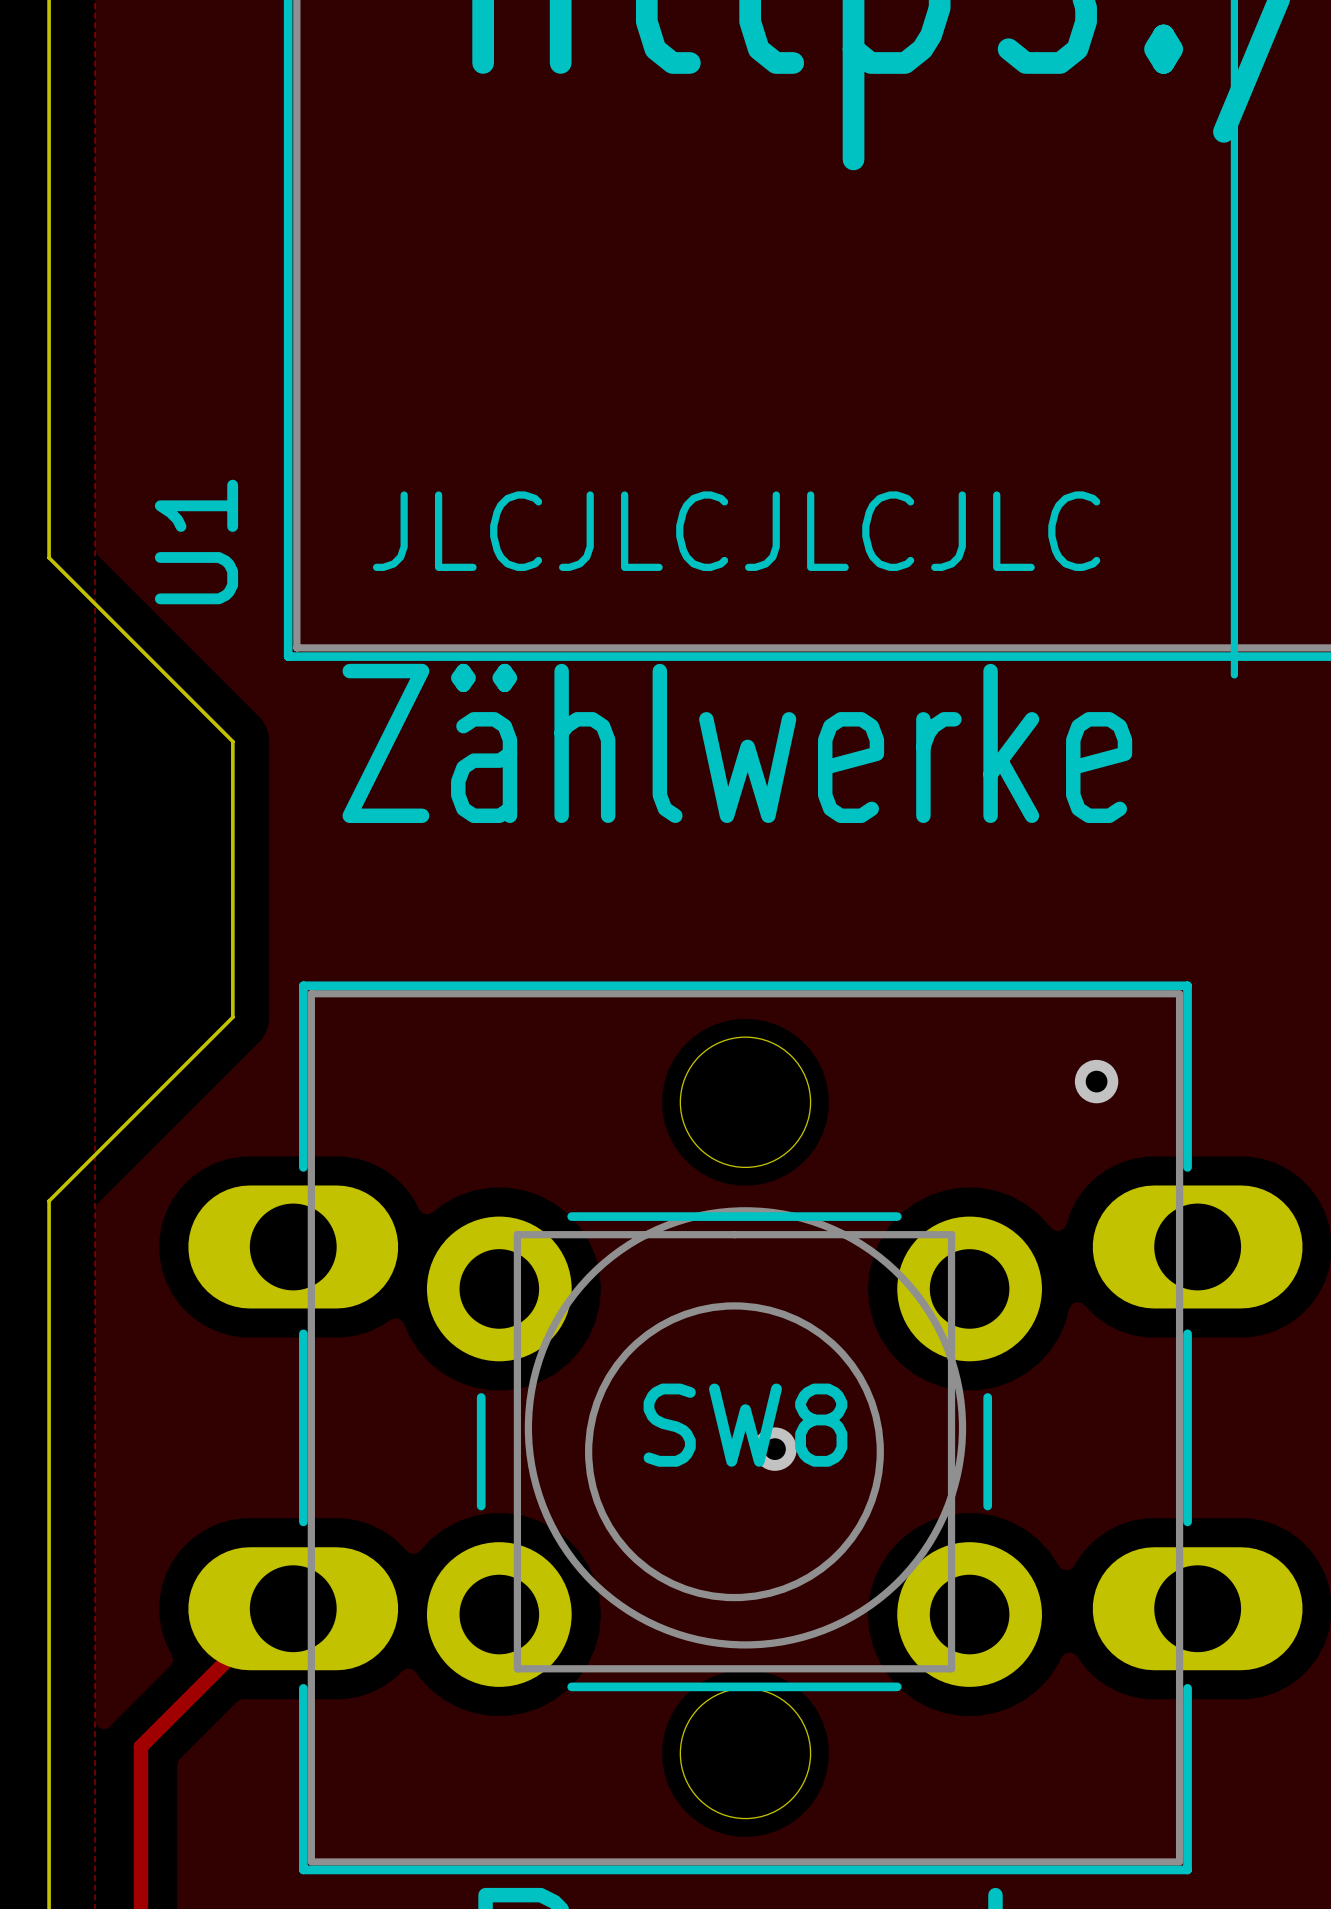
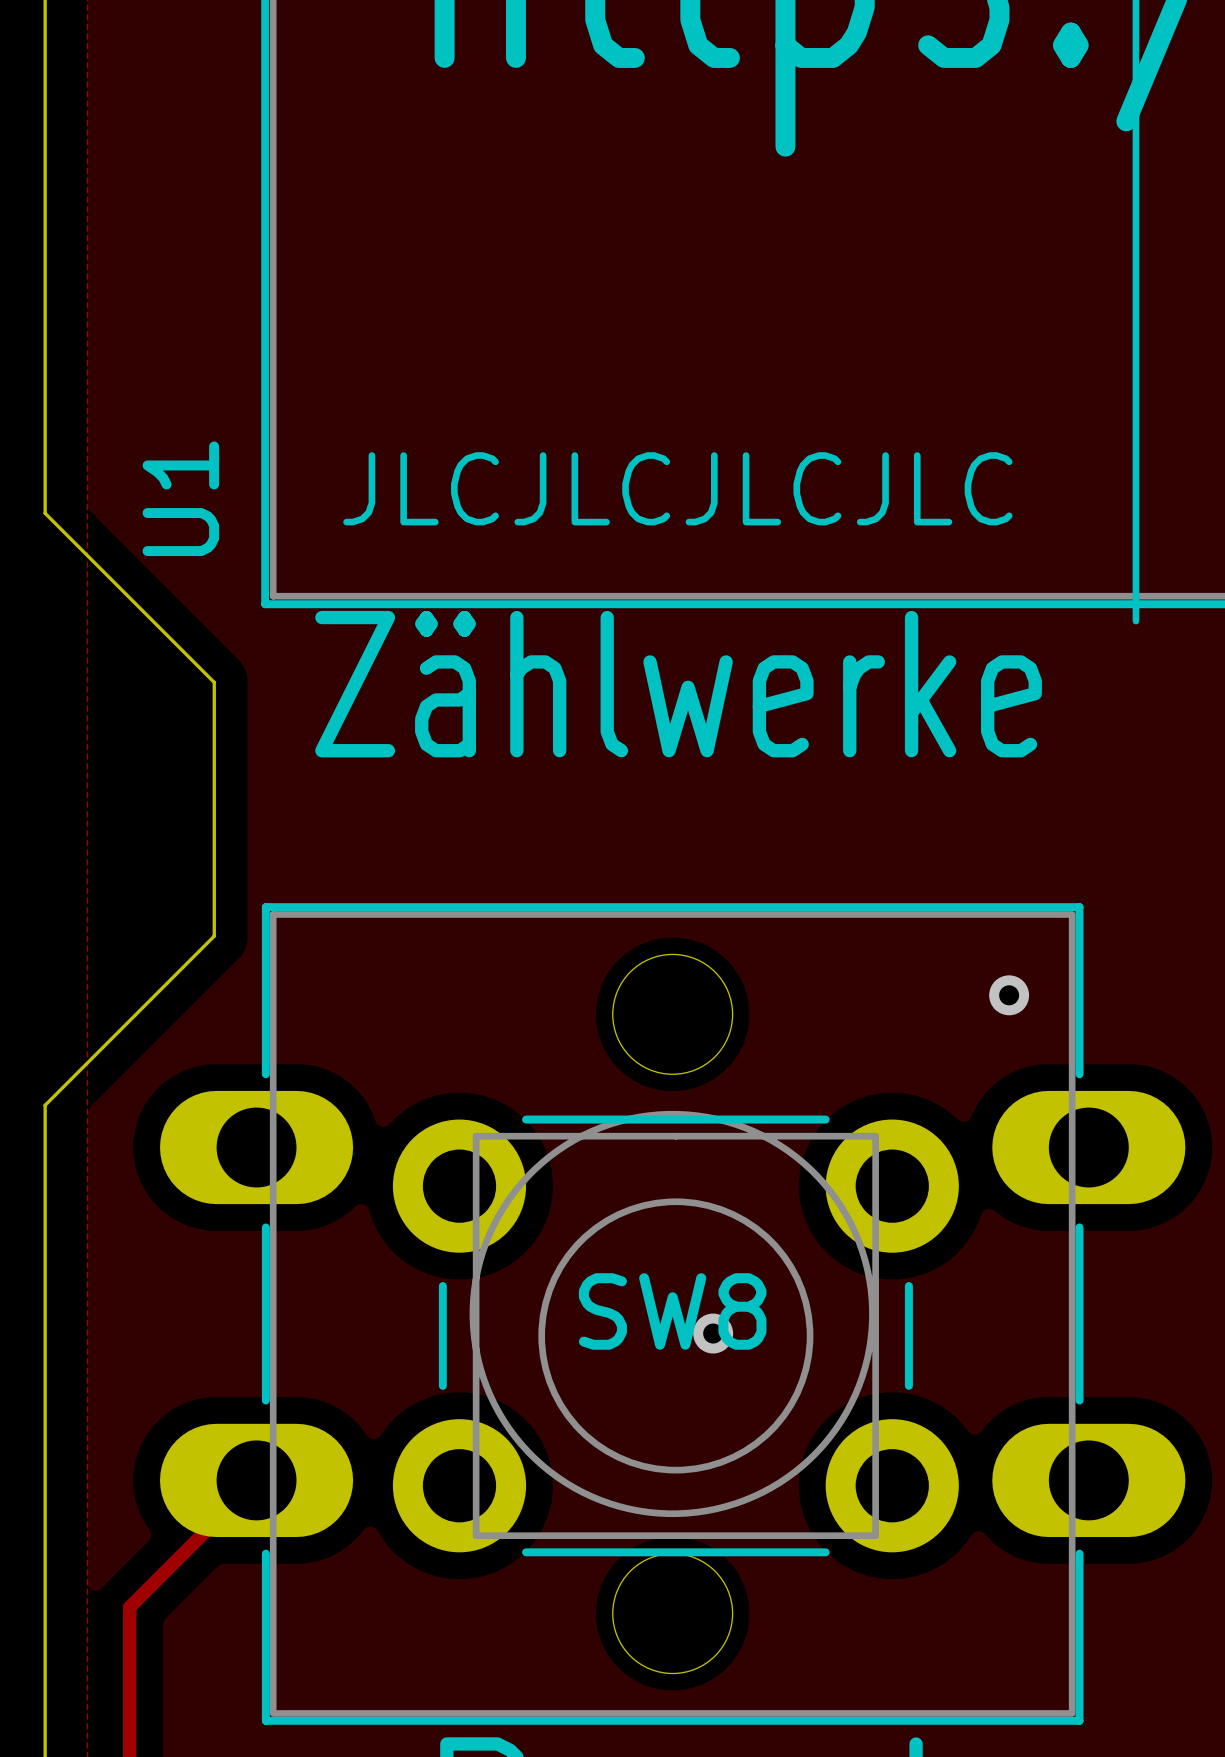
SW8 position: (745, 1427) -> (672, 1313)

